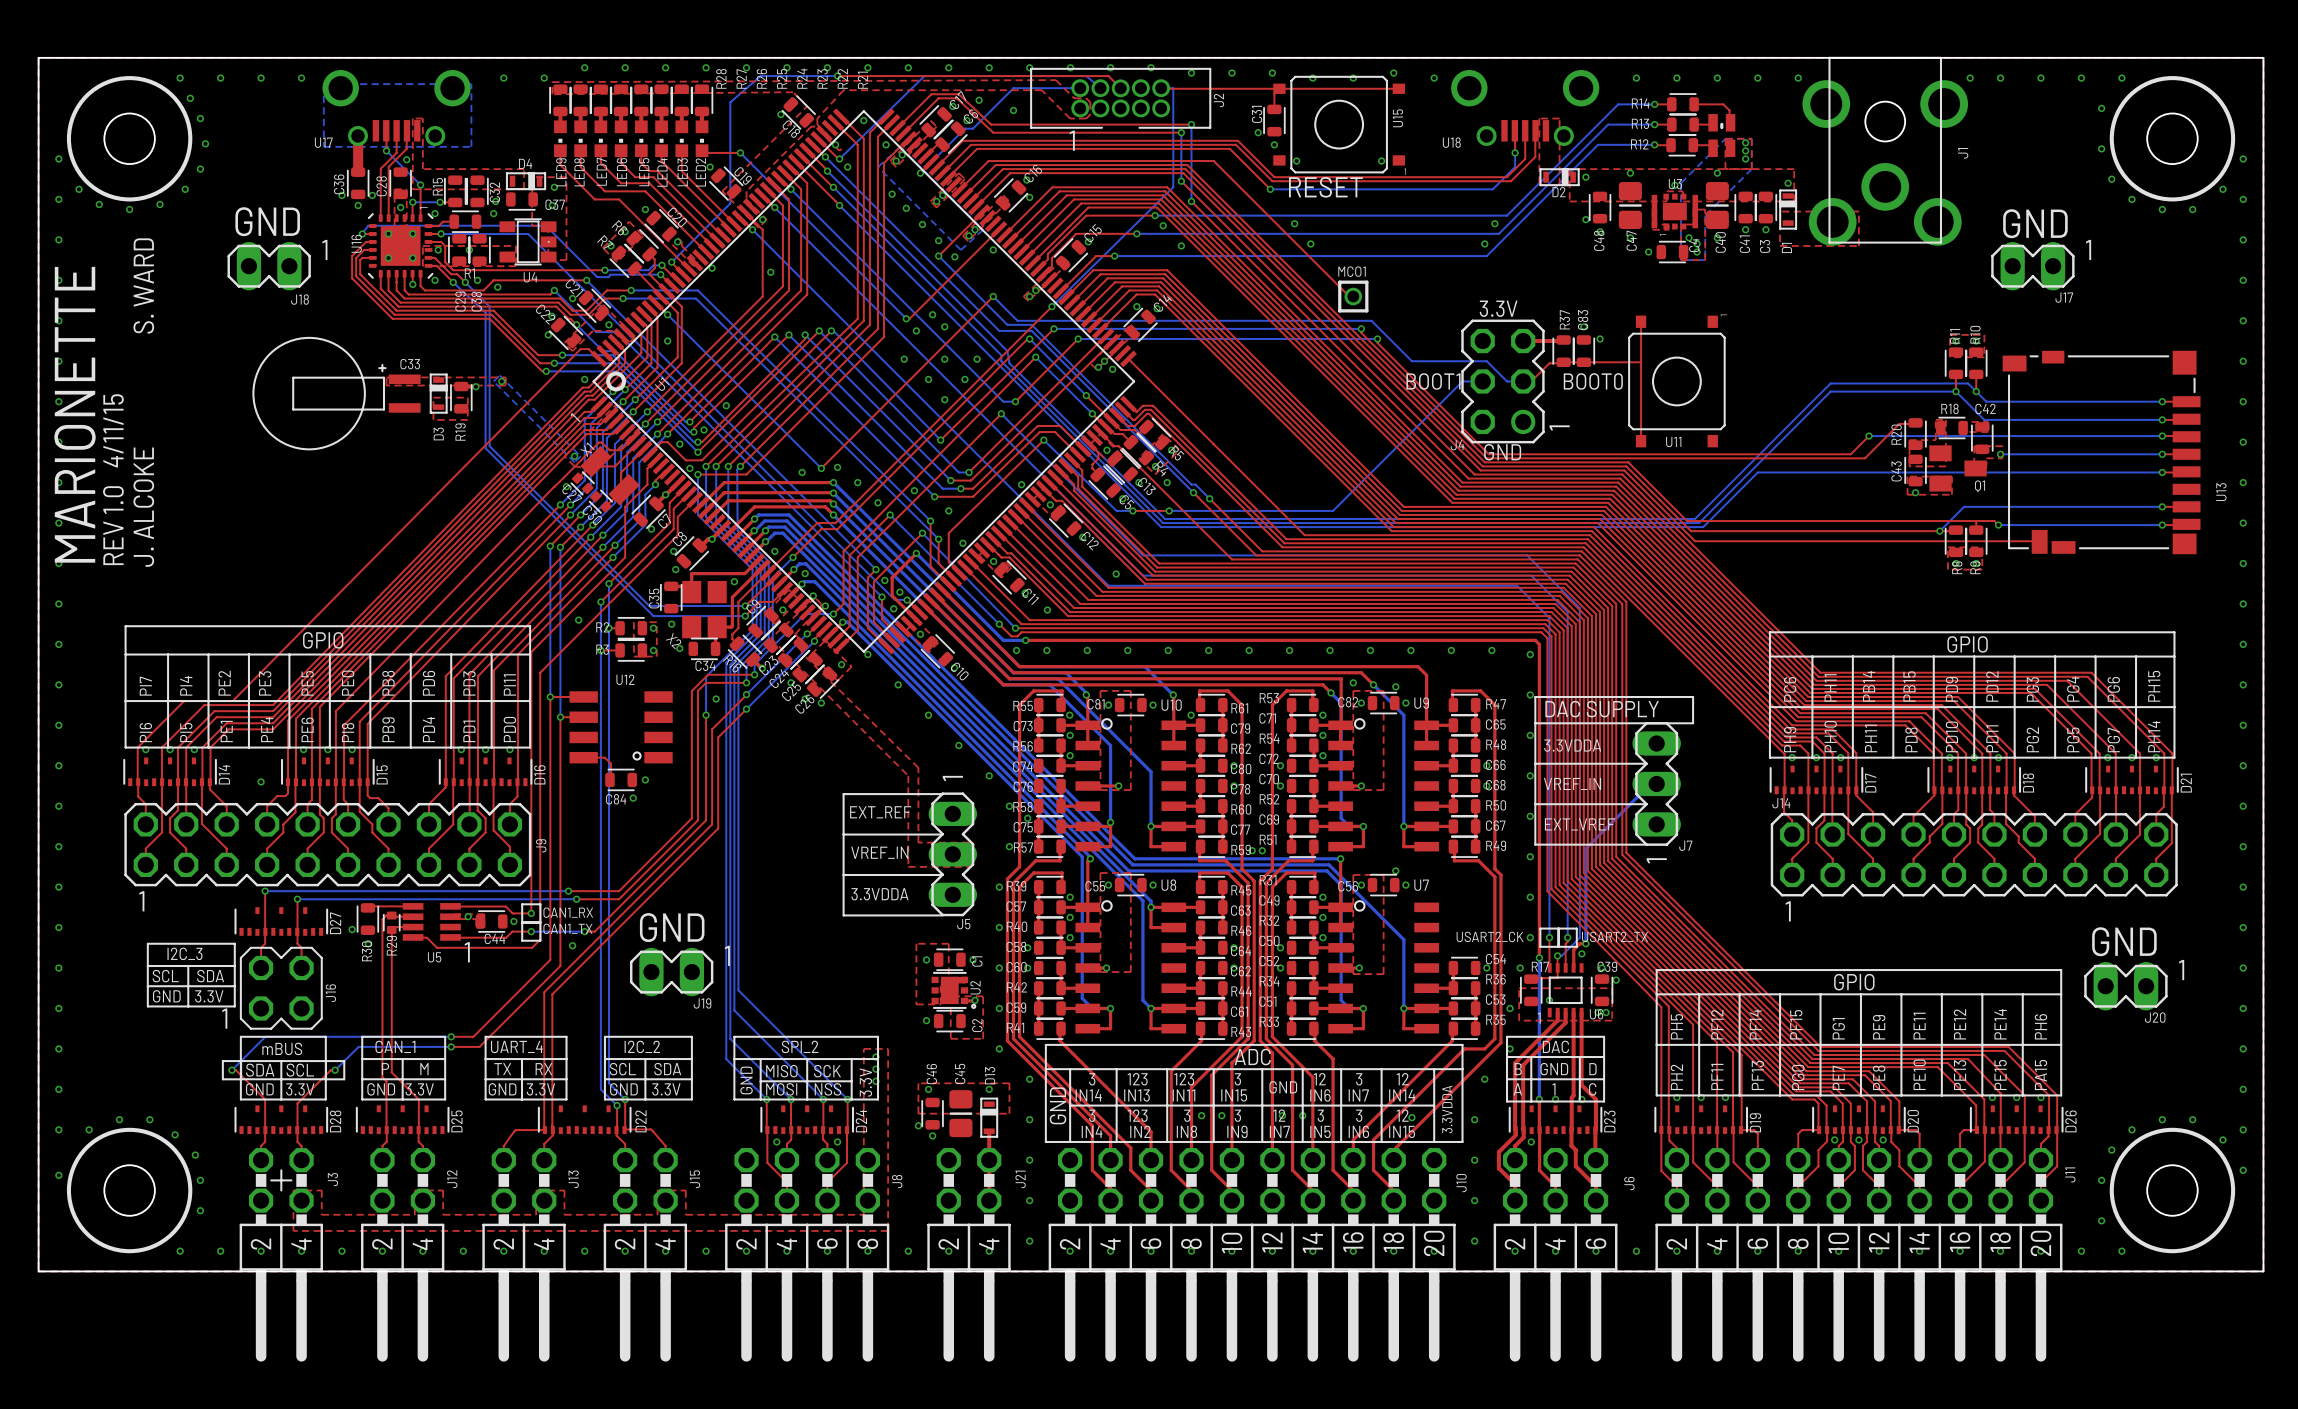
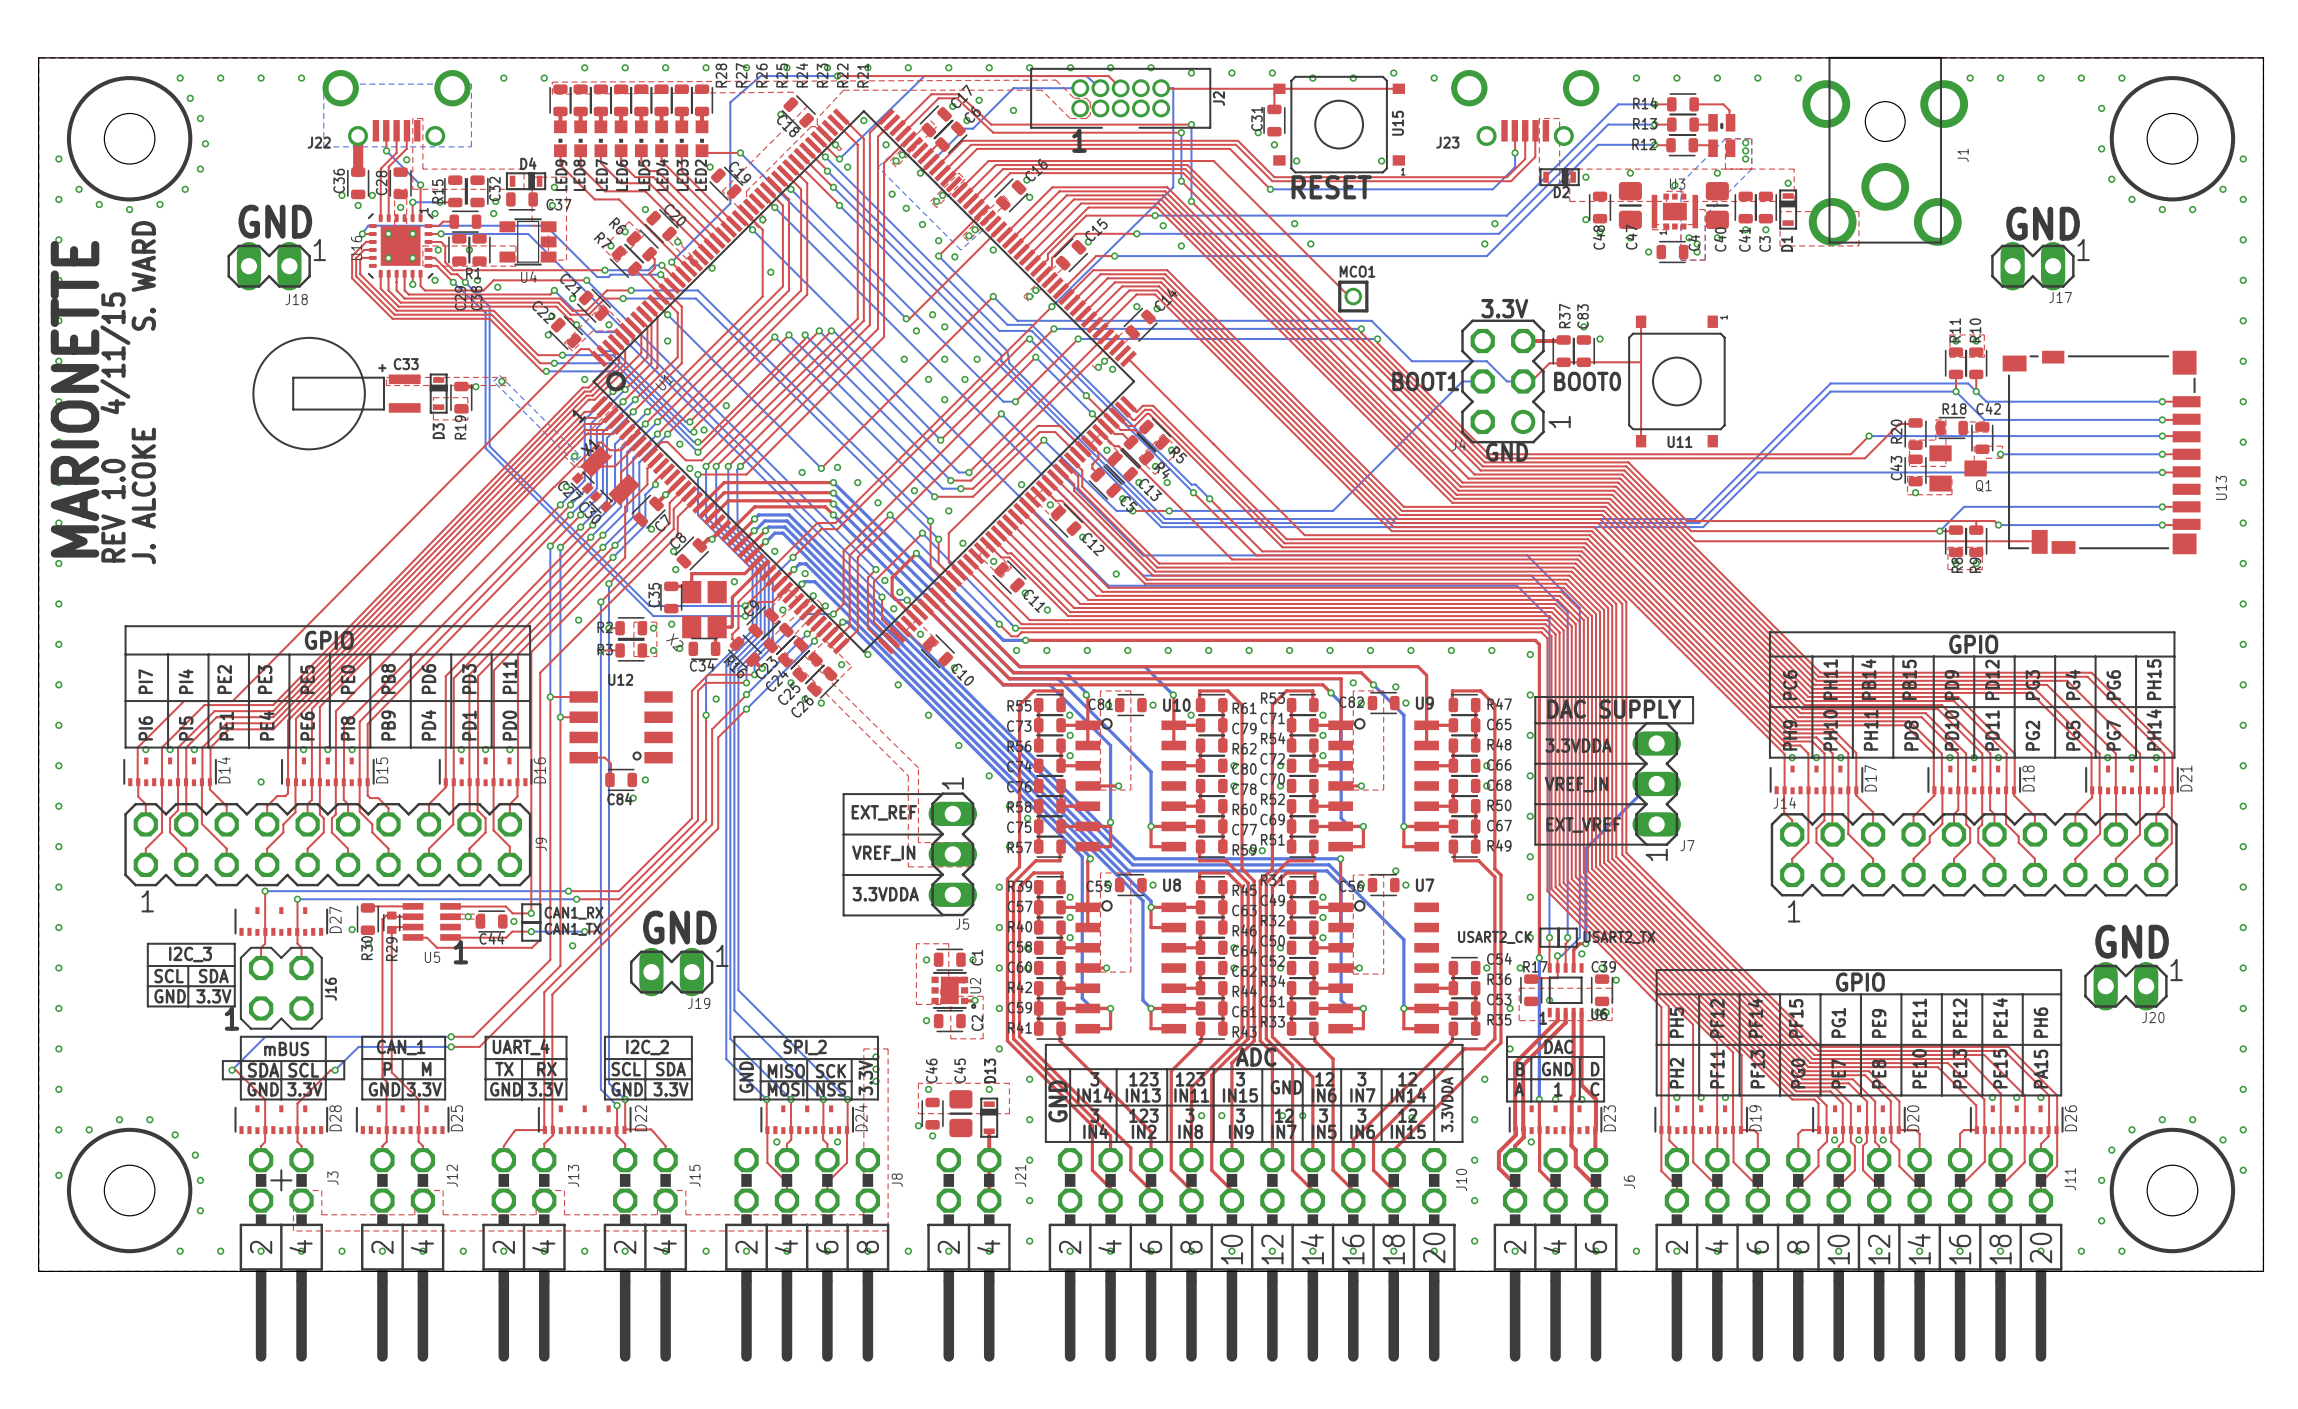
U17 name: U17 (323, 142) -> J22 (319, 142)
U18 name: U18 (1451, 142) -> J23 (1447, 142)

